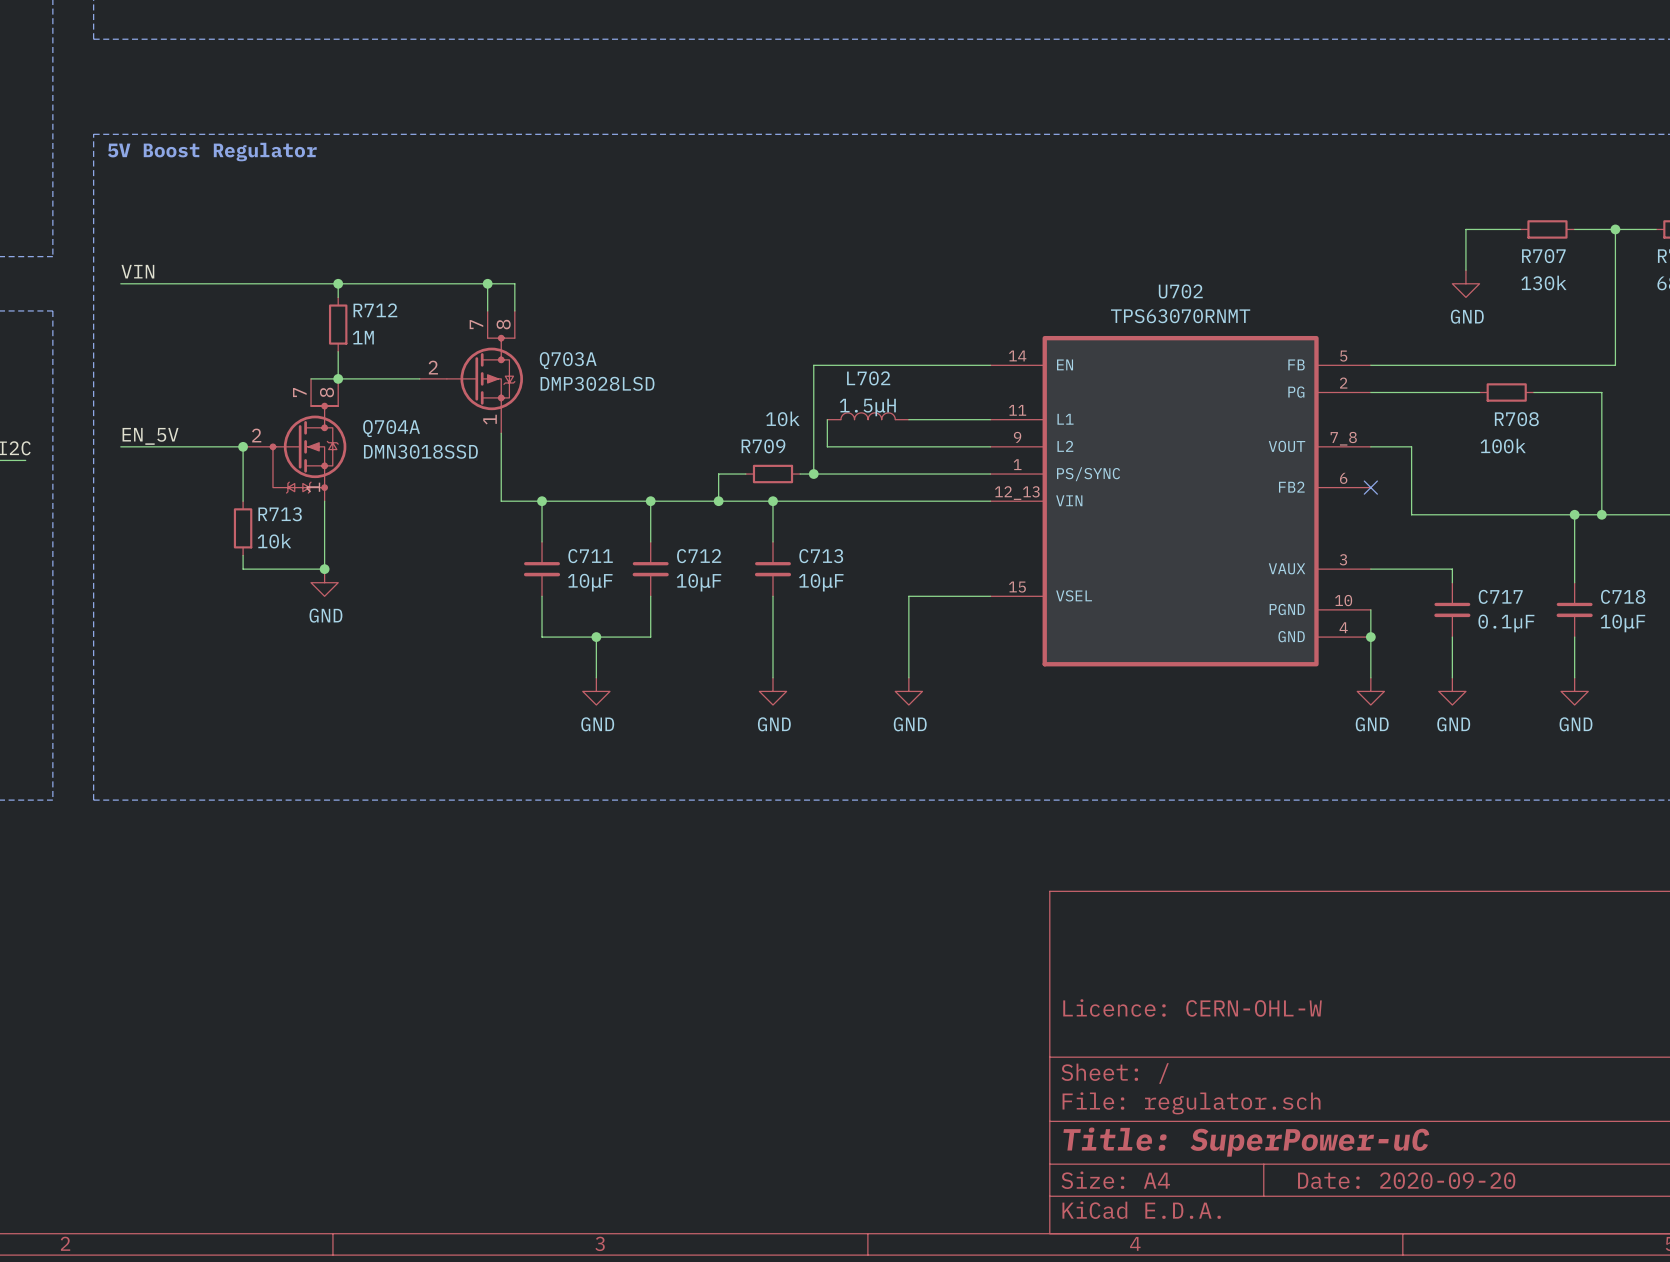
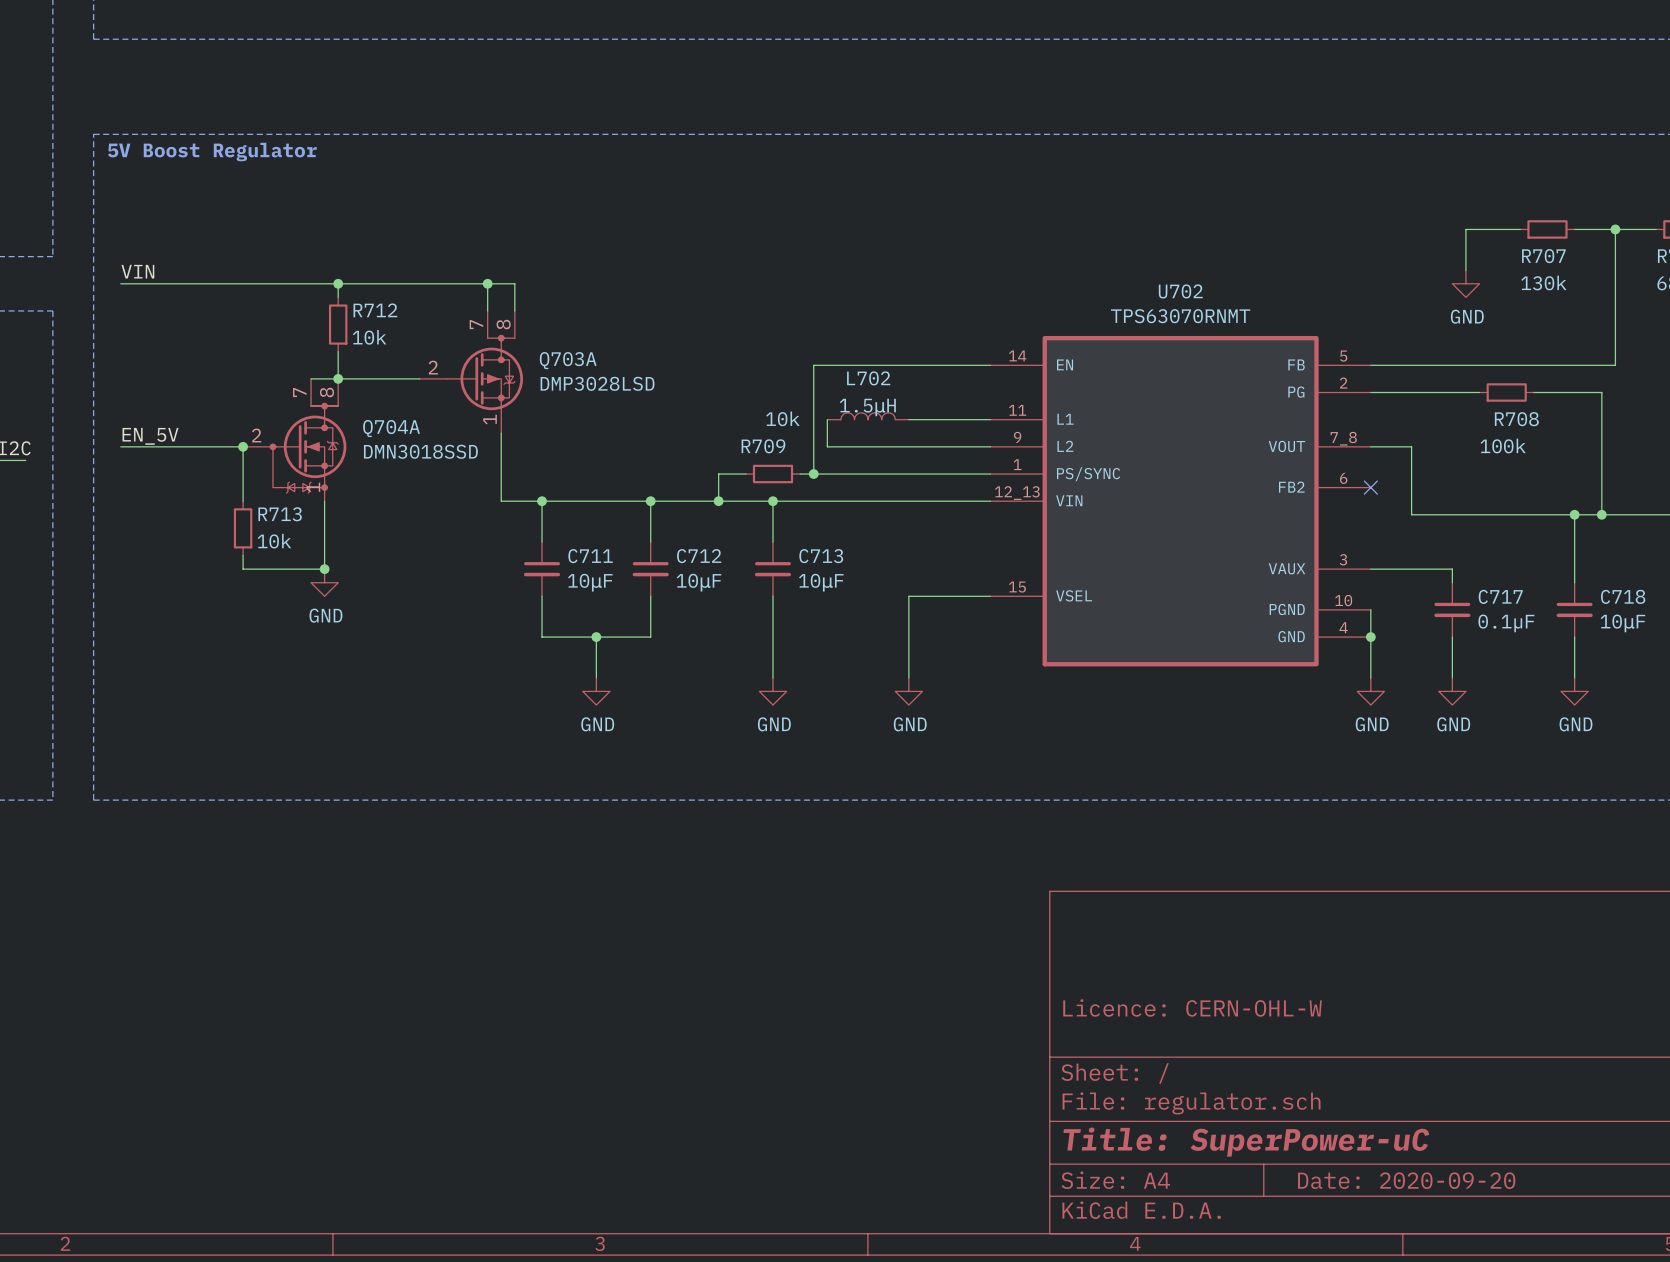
R712 value: 1M (363, 337) -> 10k (369, 337)

